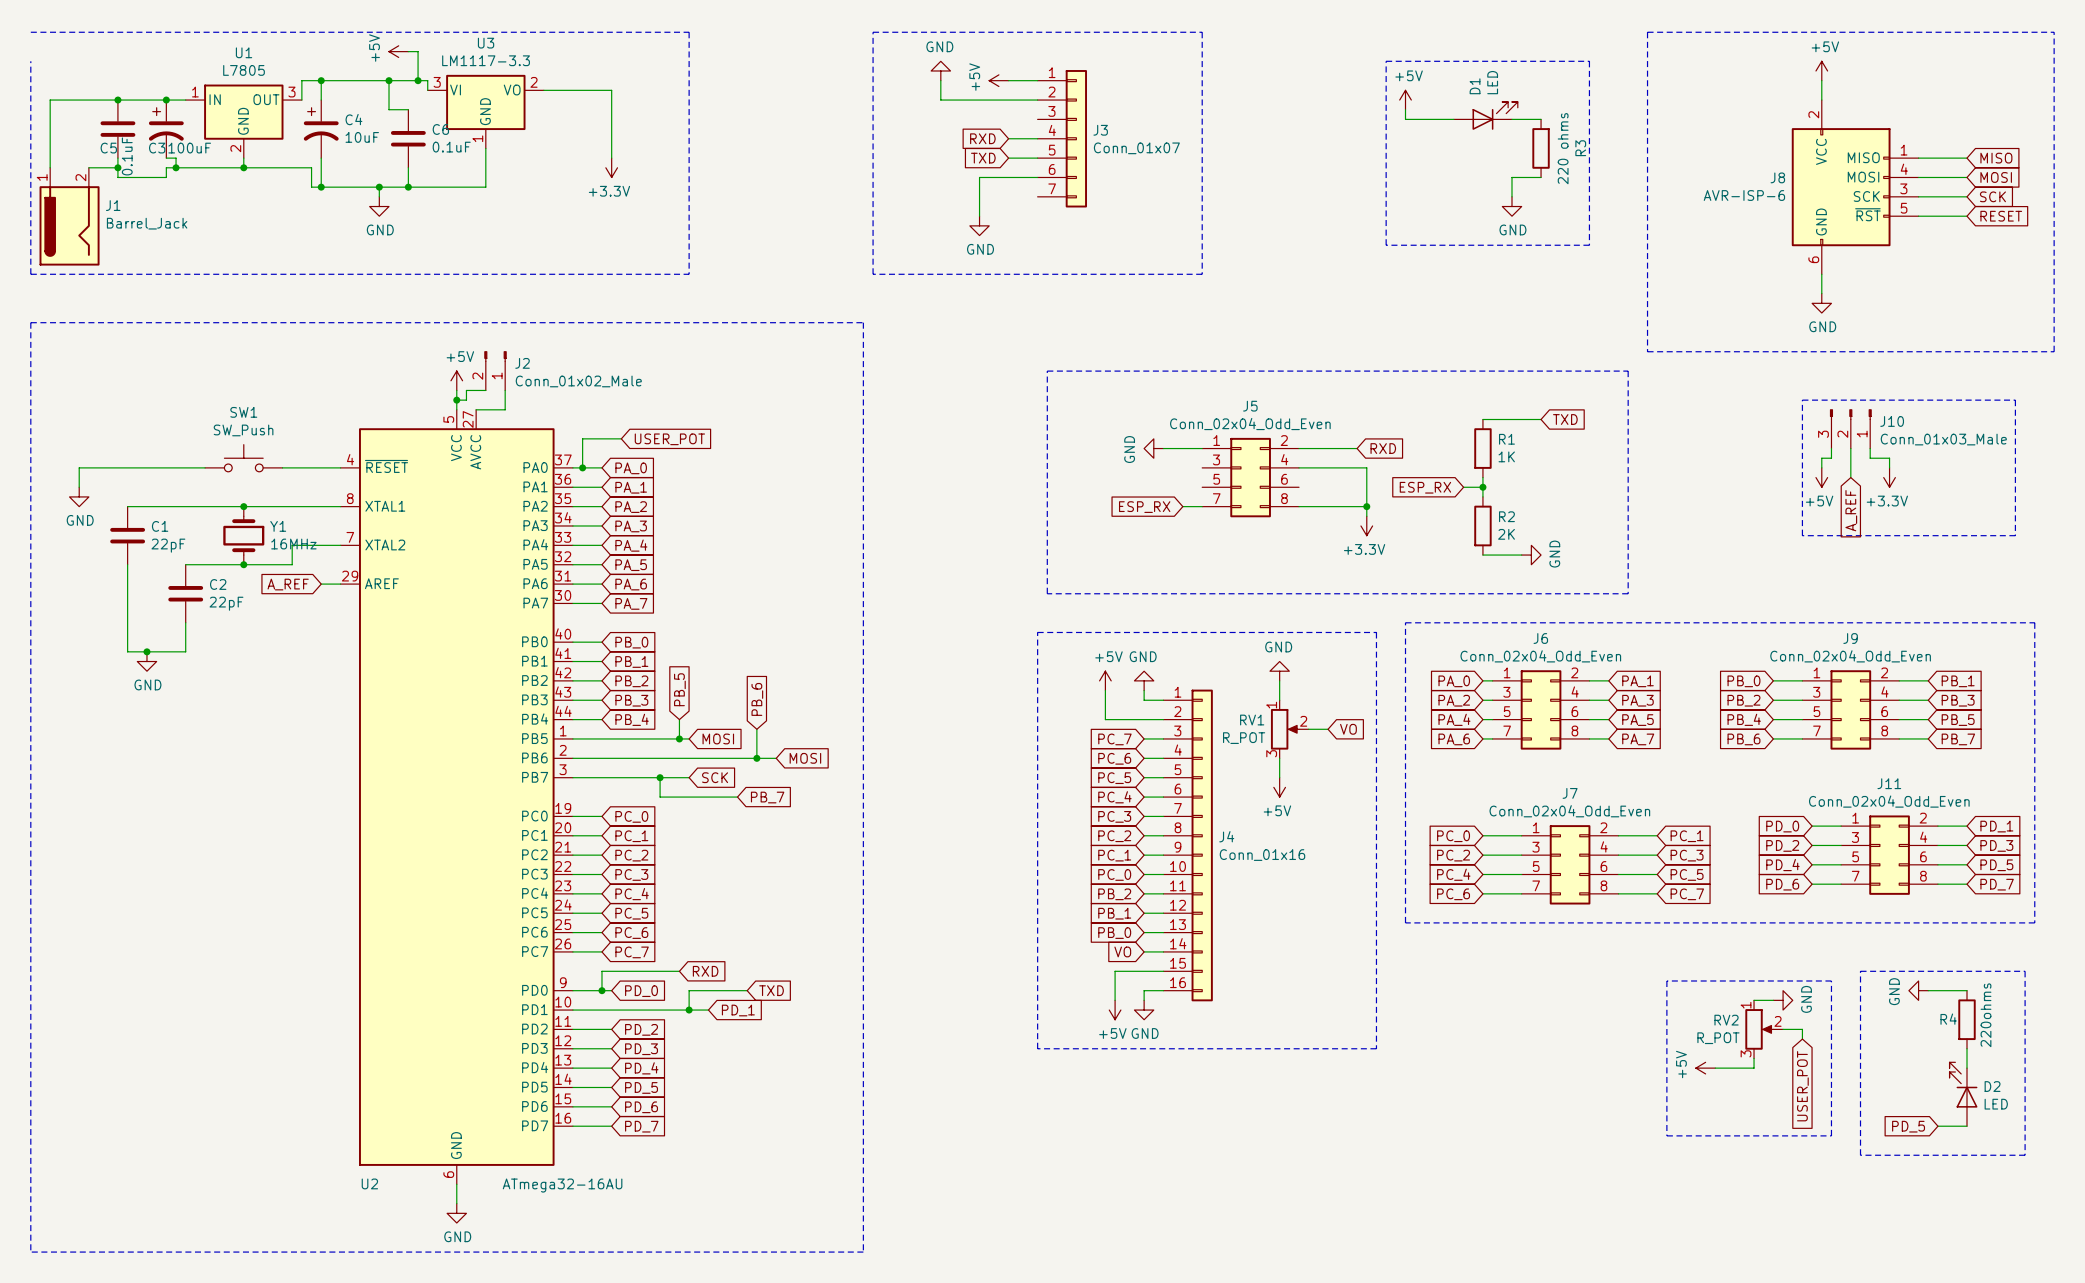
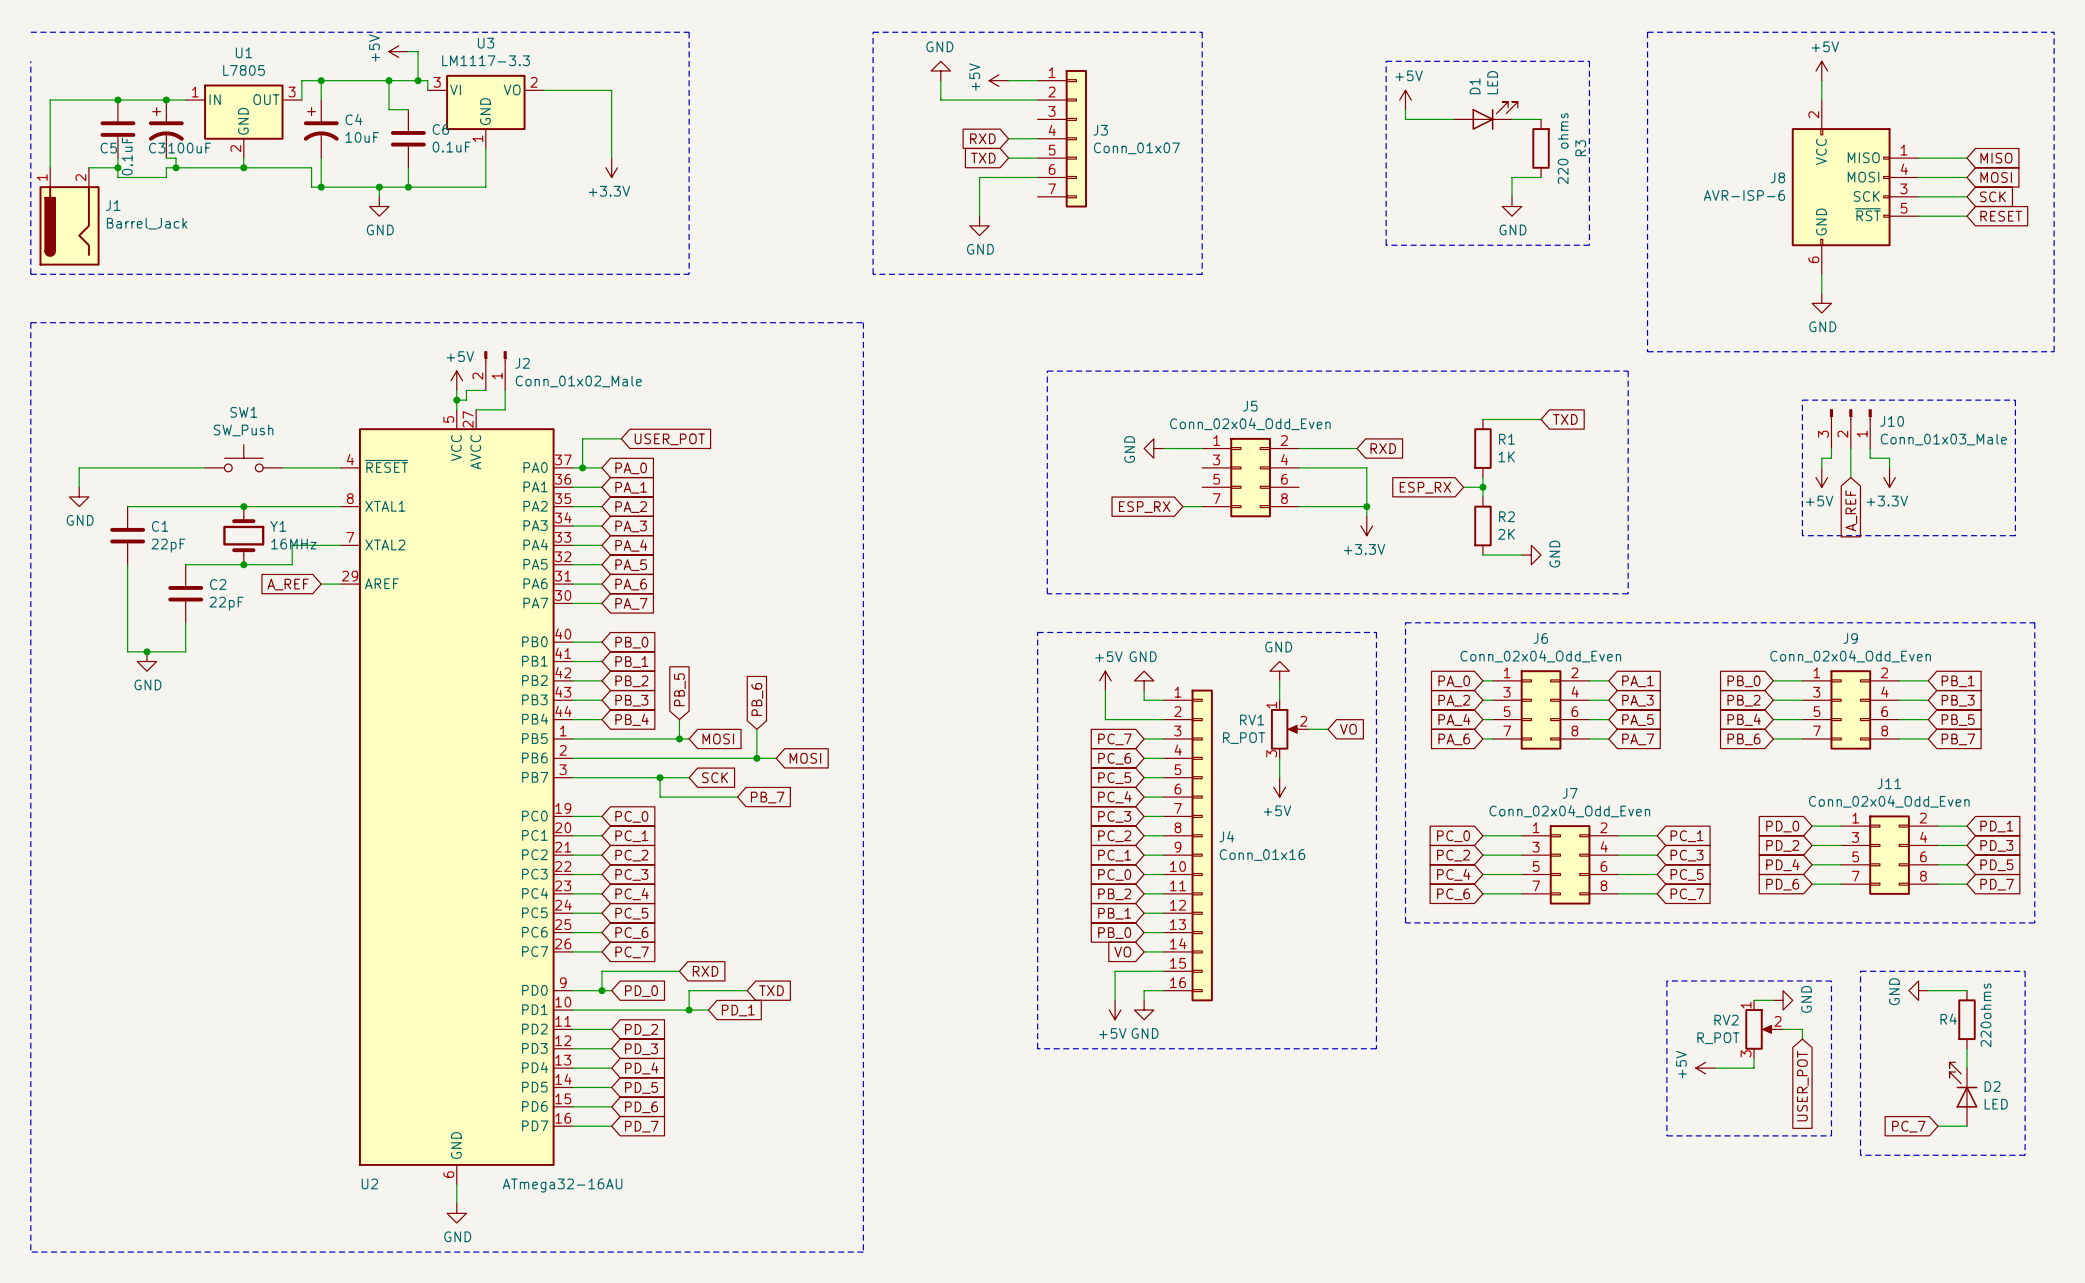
global label: PD_5 (1908, 1126) -> PC_7 (1908, 1126)

